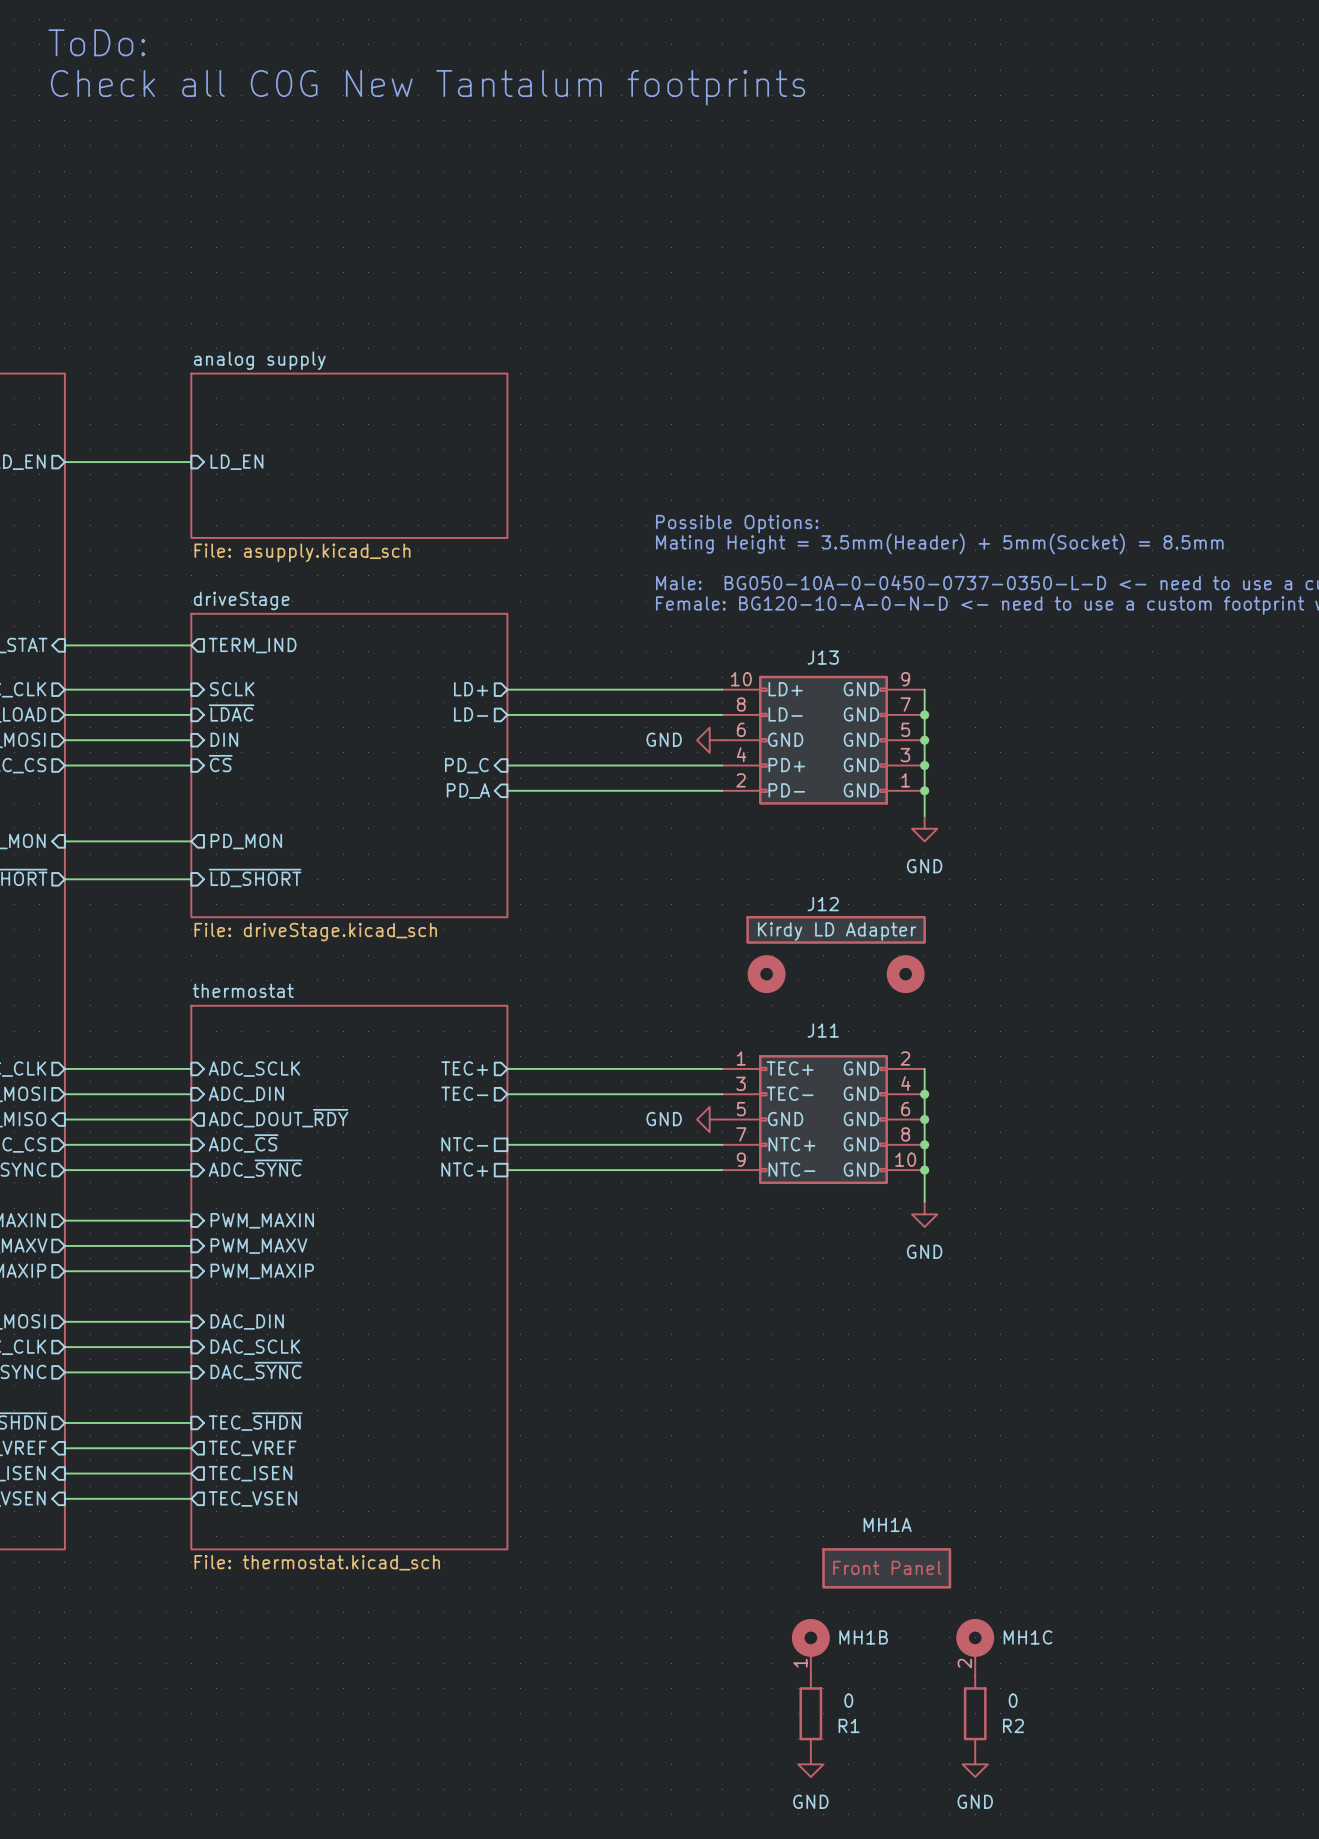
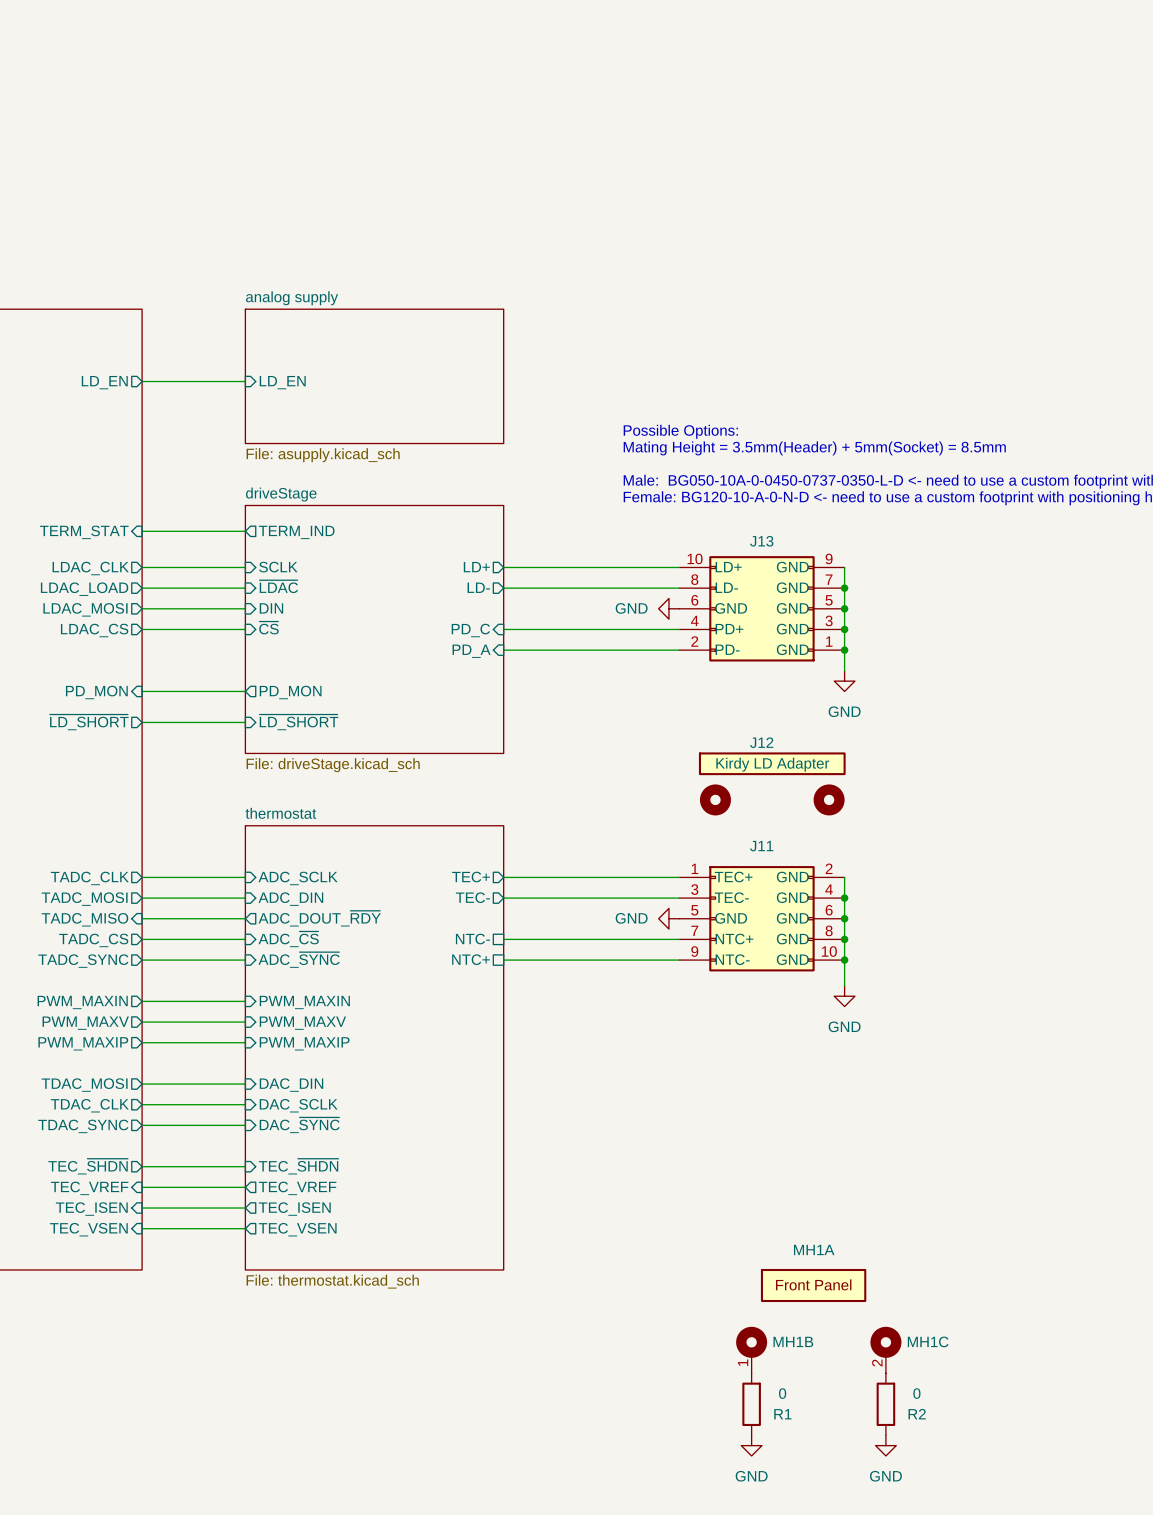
text: ToDo: (96, 42) -> none
text: Check all C0G New Tantalum footprints (428, 87) -> none

